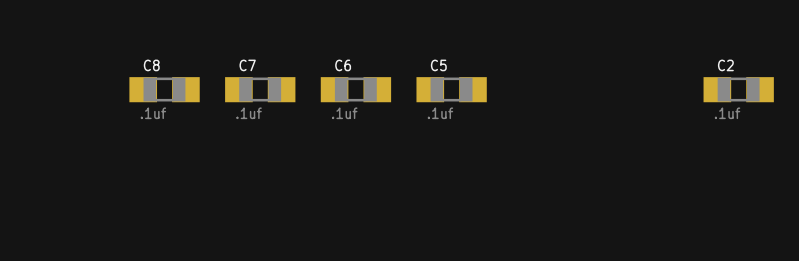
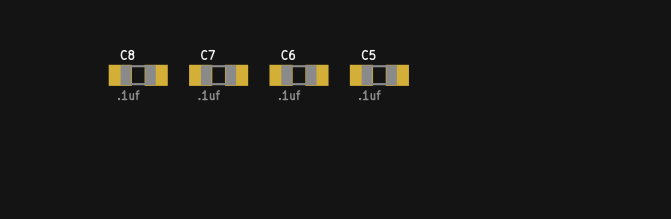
C2: .1uf (738, 89) -> none

